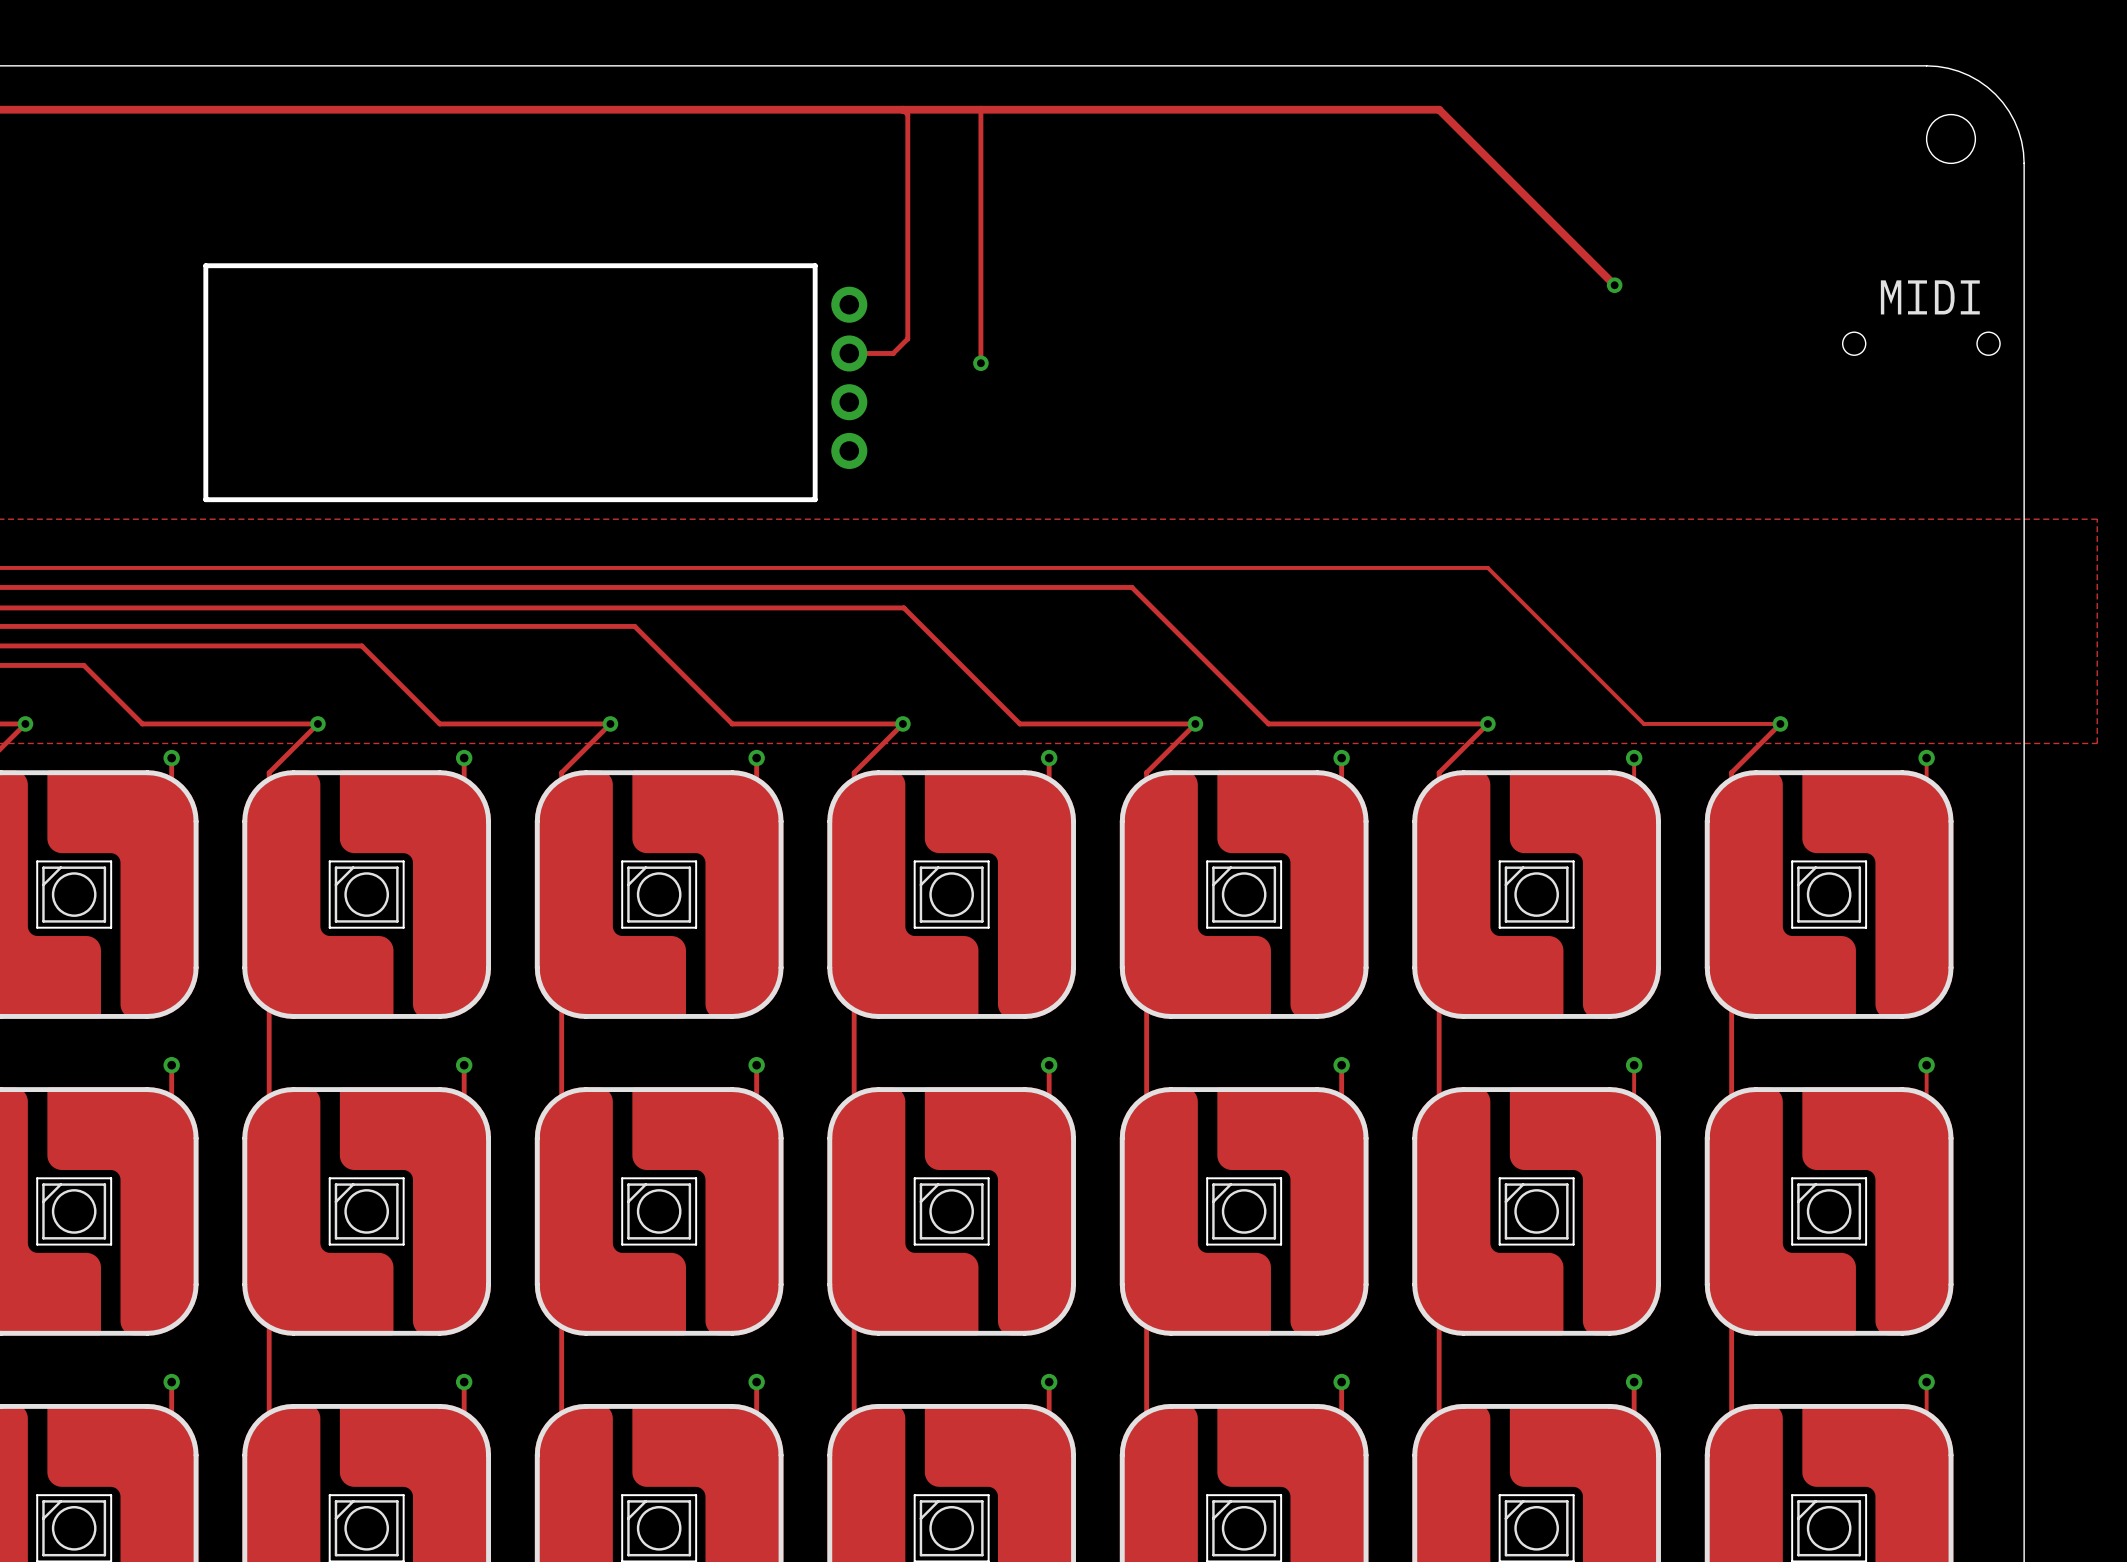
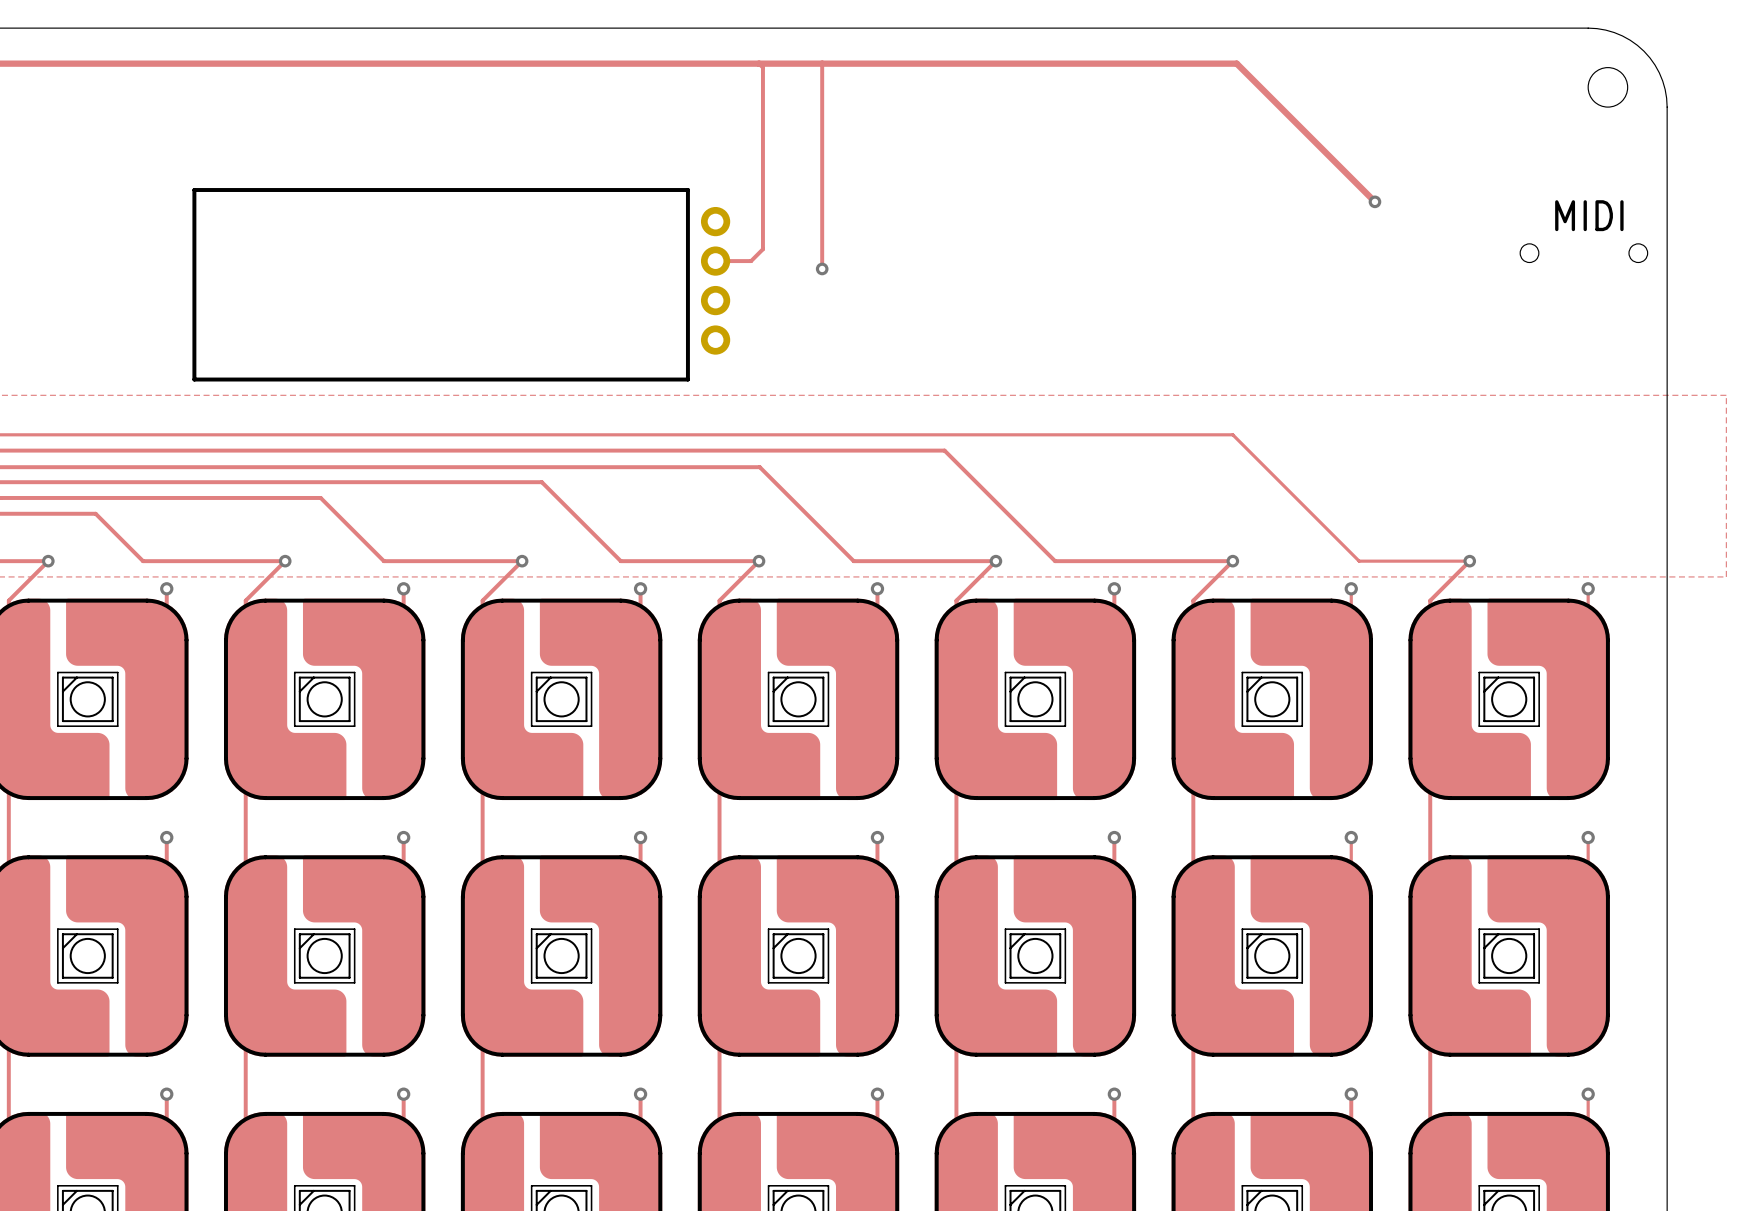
track: (1439, 109) (1614, 285) -> (1193, 63) (1236, 63) (1374, 201)
via position: (1614, 285) -> (1374, 201)

